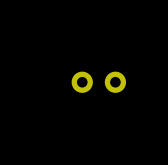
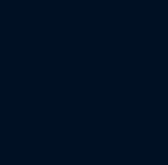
part: (98, 82) -> none

